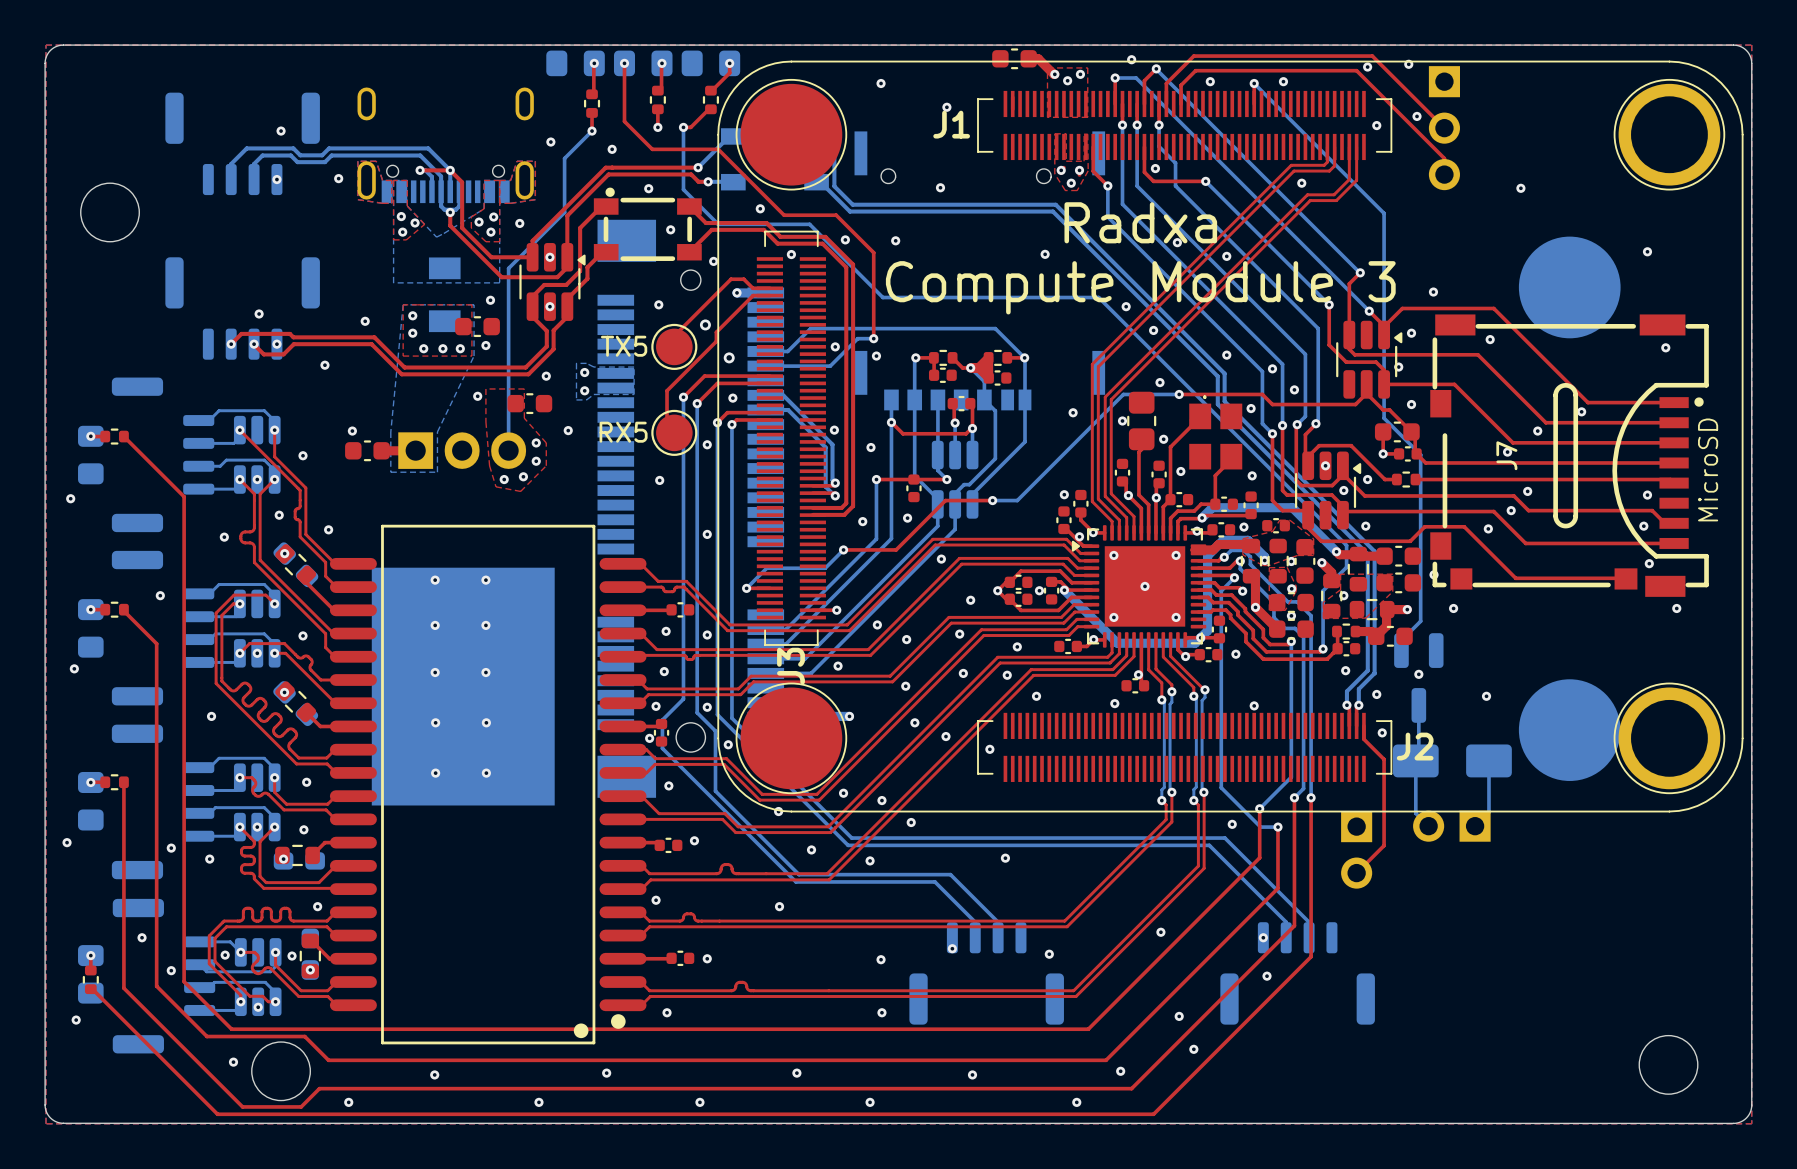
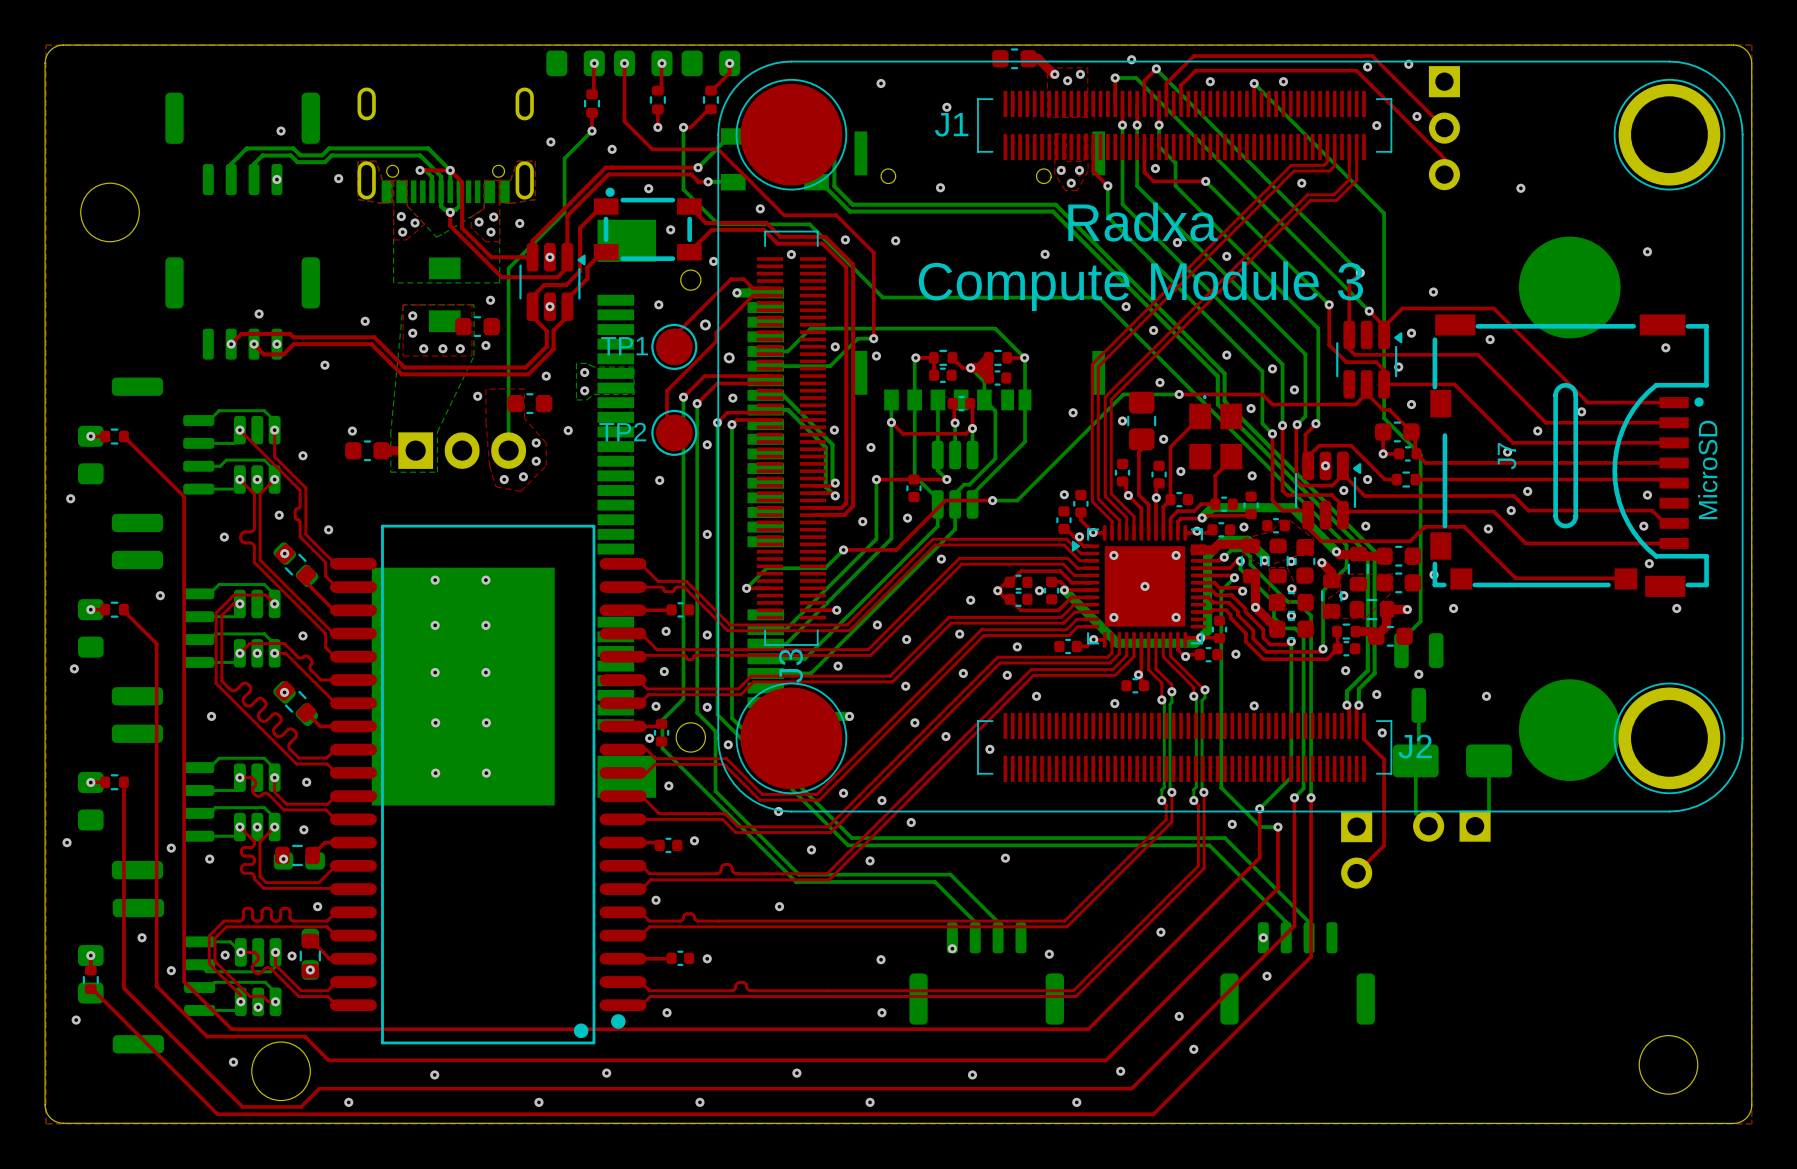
TX5 name: TX5 (624, 346) -> TP1 (624, 346)
RX5 name: RX5 (623, 432) -> TP2 (622, 432)

